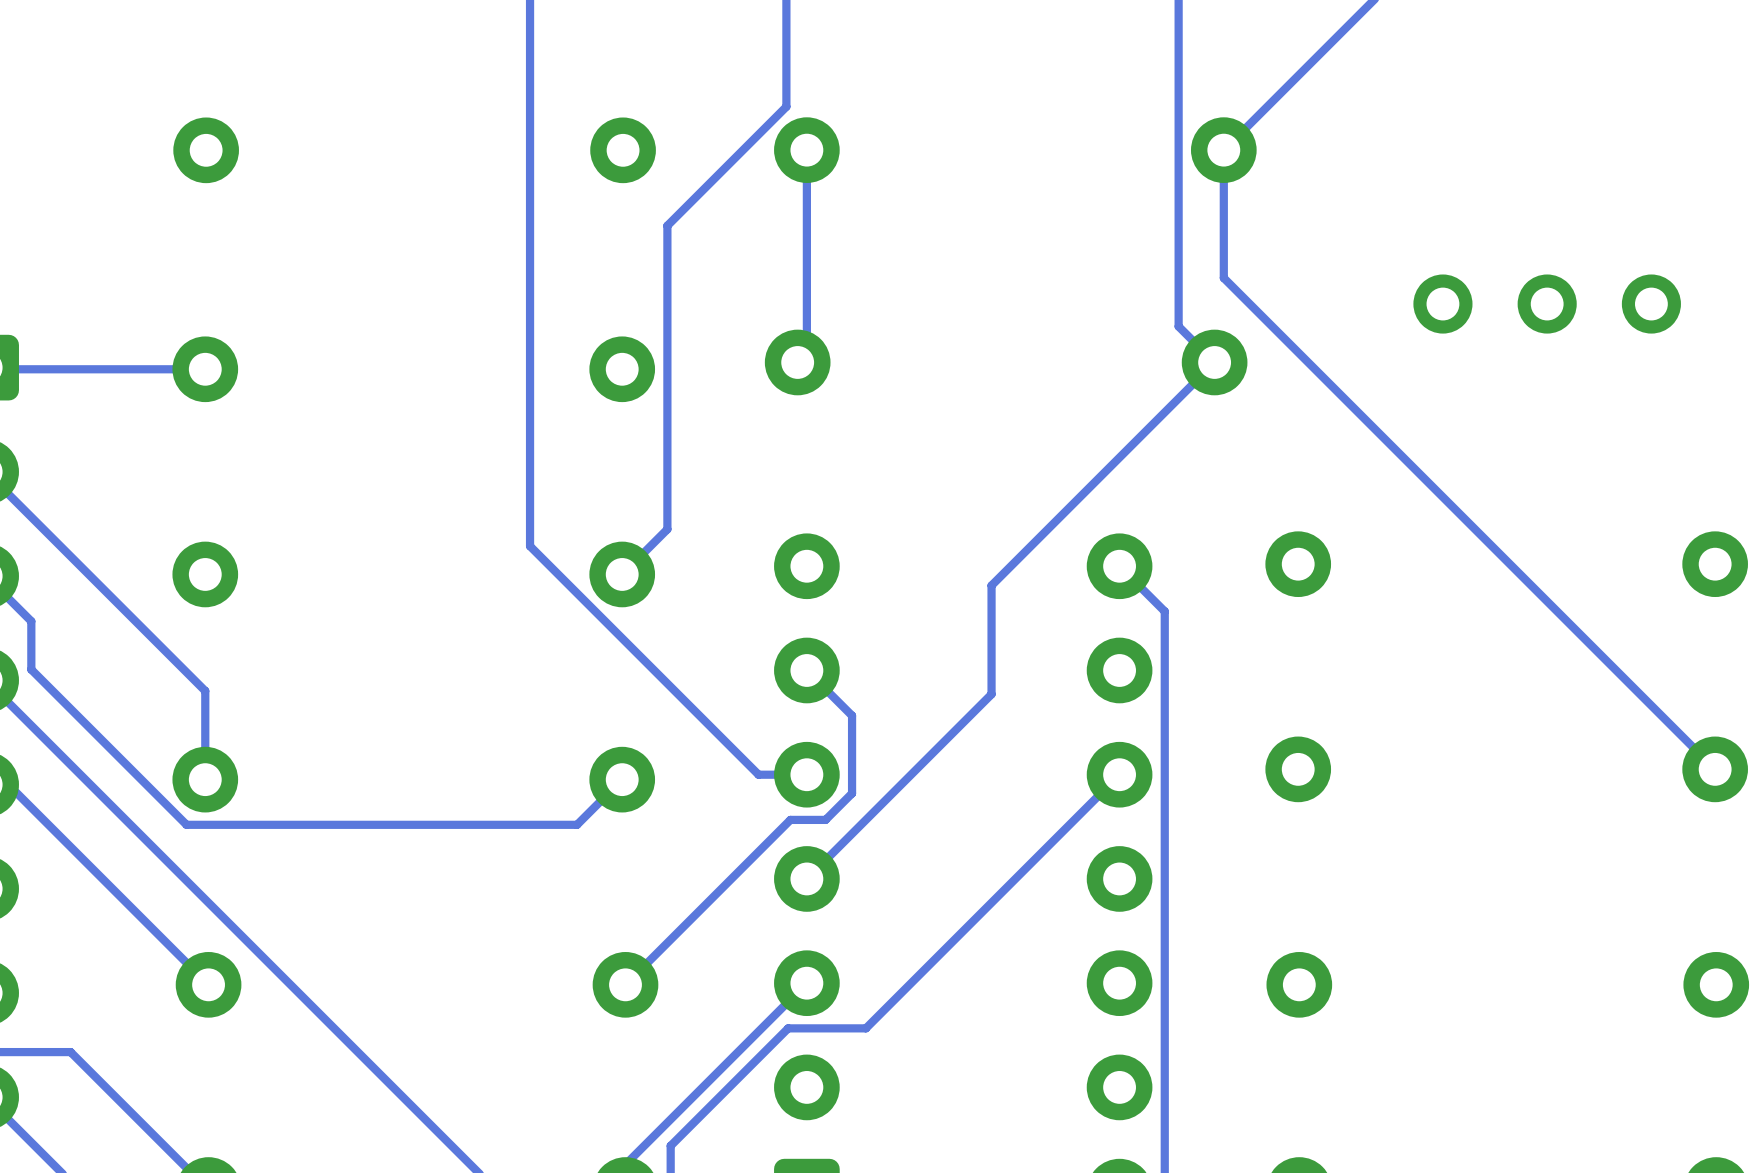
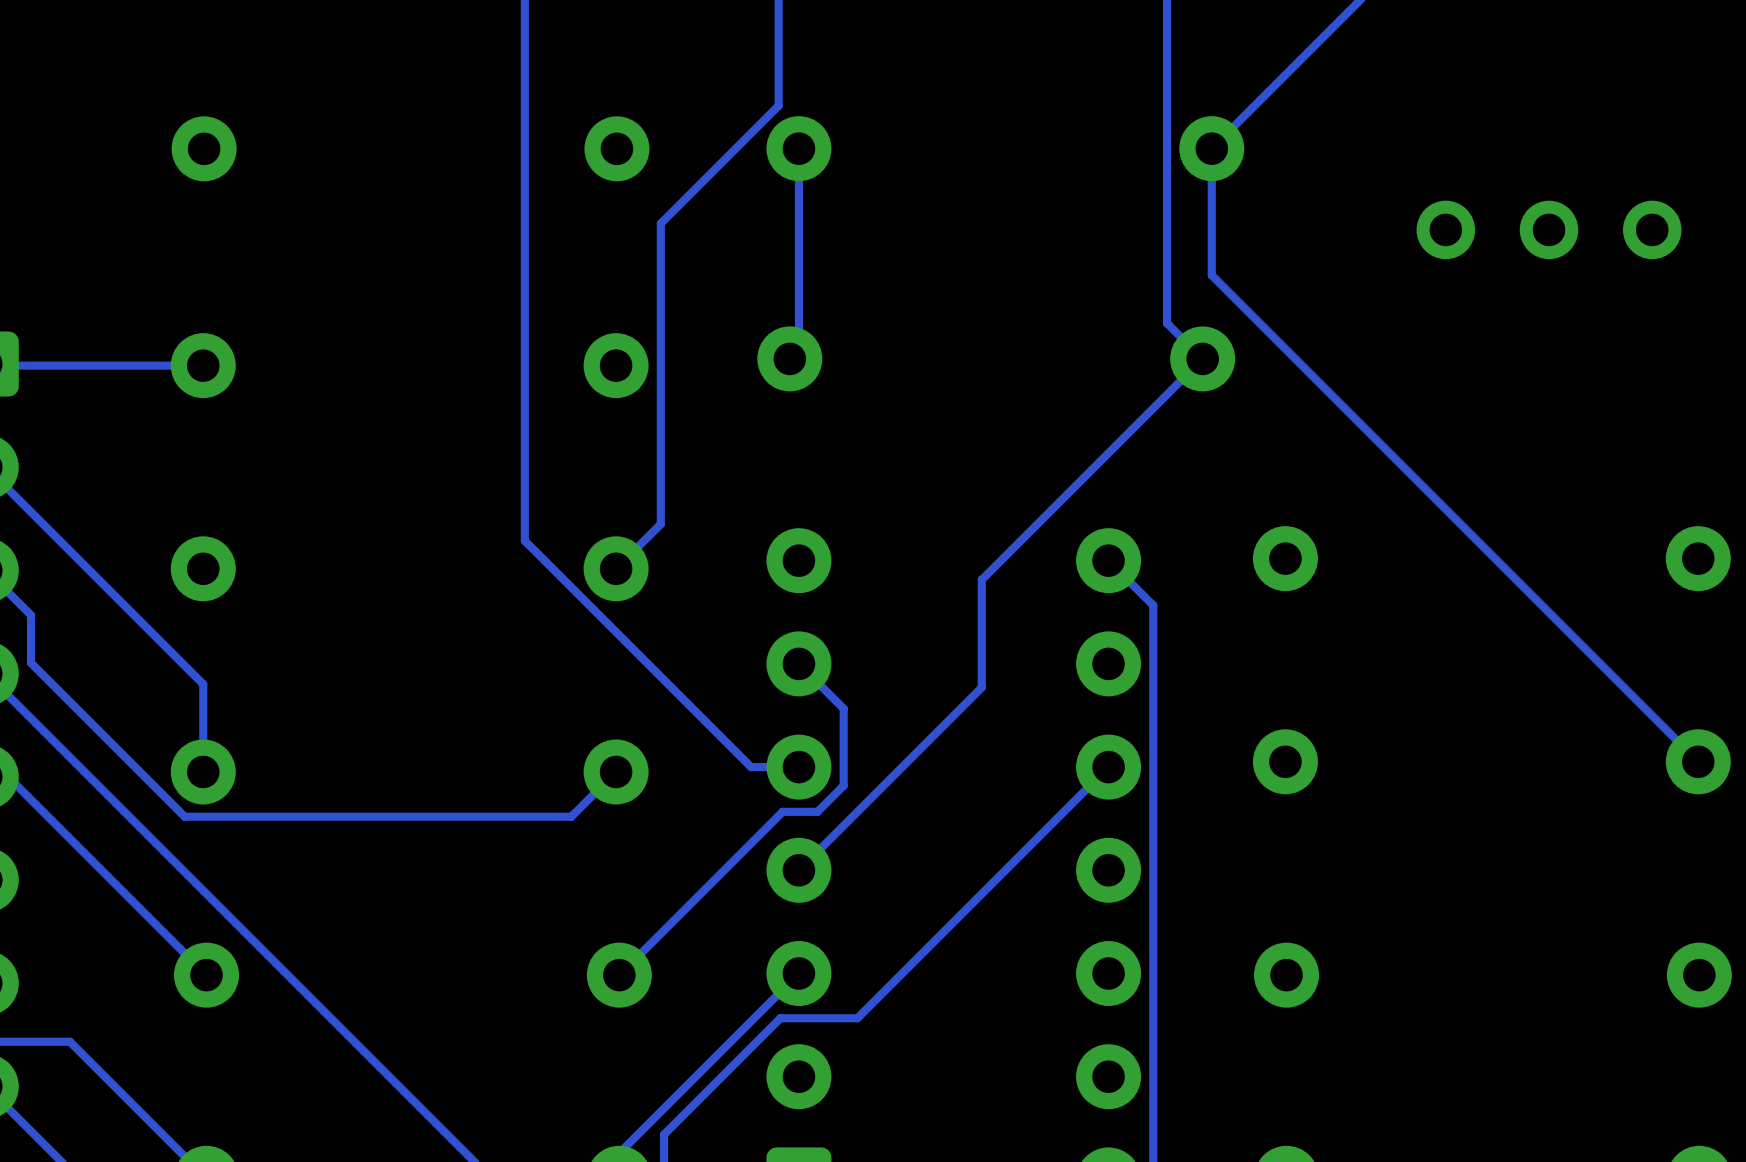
part position: (1547, 304) -> (1549, 229)

